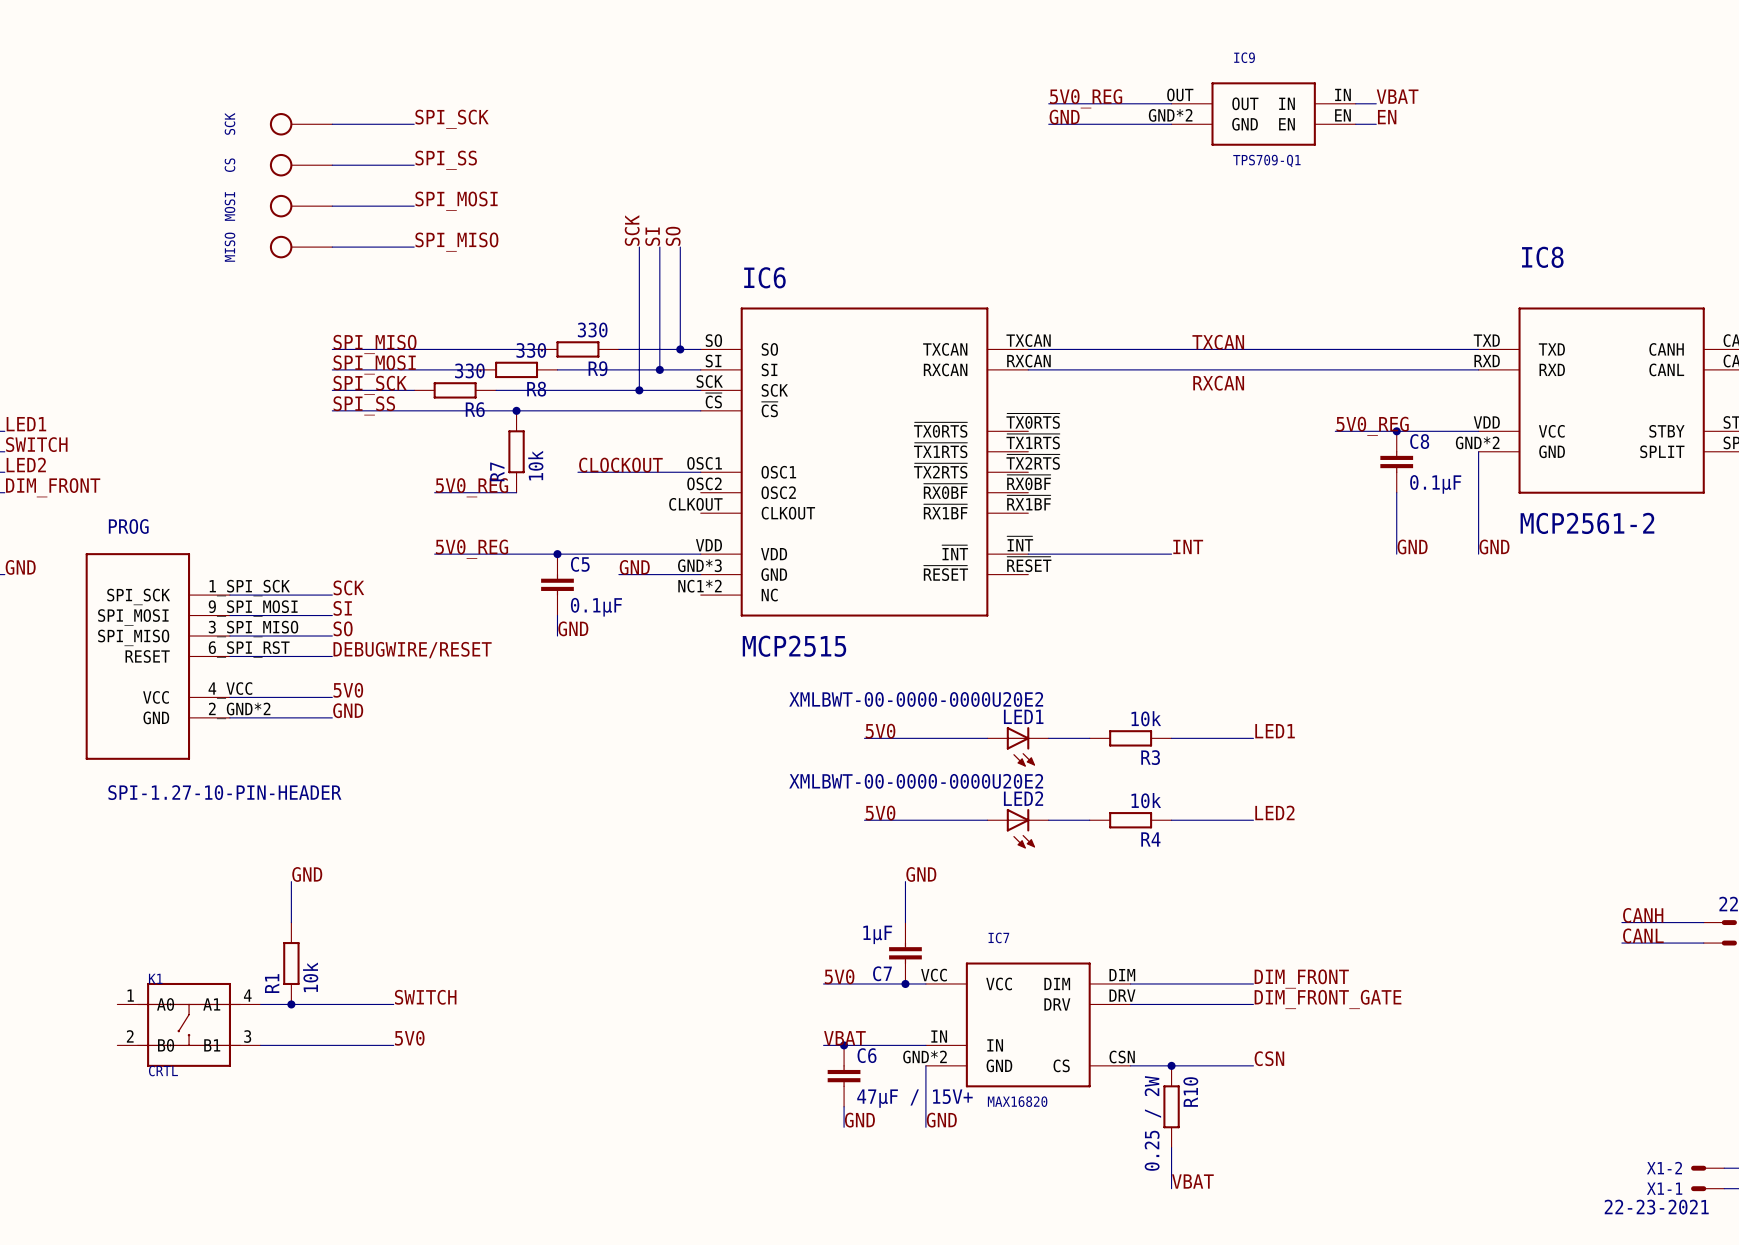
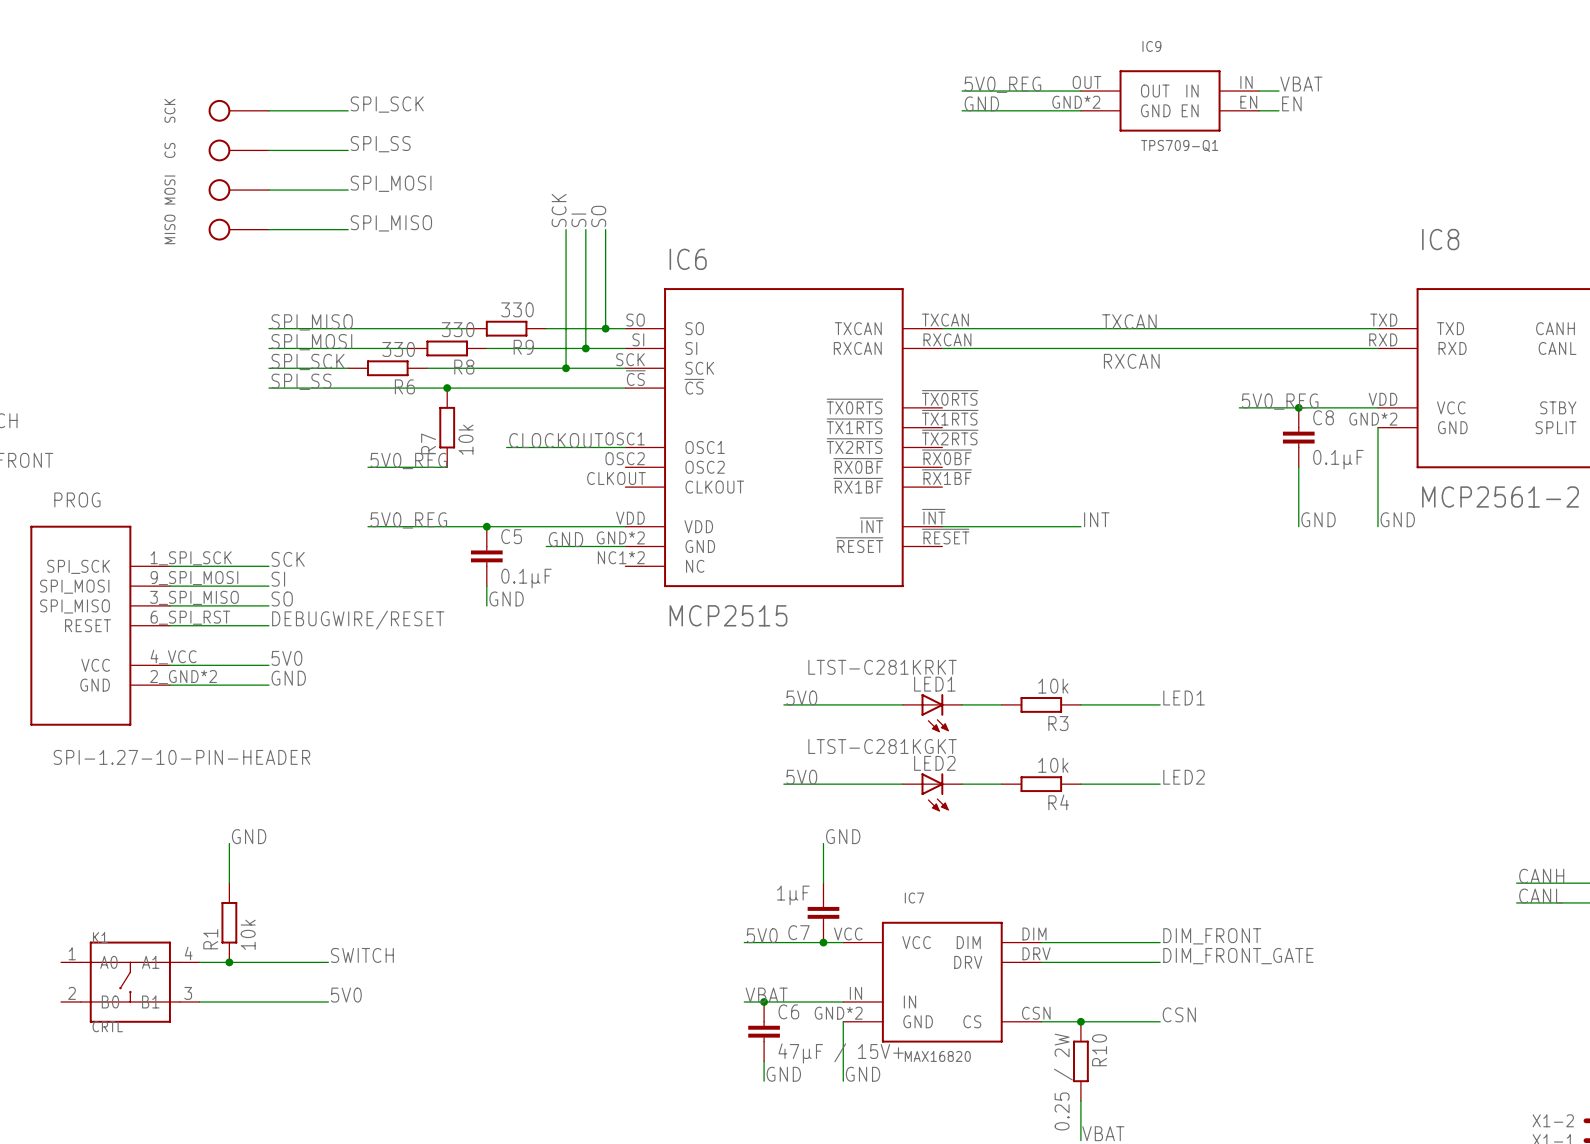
IC6 pin number: GND*3 (699, 565) -> GND*2 (620, 537)
LED1 value: XMLBWT-00-0000-0000U20E2 (916, 699) -> LTST-C281KRKT (882, 667)
LED2 value: XMLBWT-00-0000-0000U20E2 (916, 781) -> LTST-C281KGKT (882, 746)

